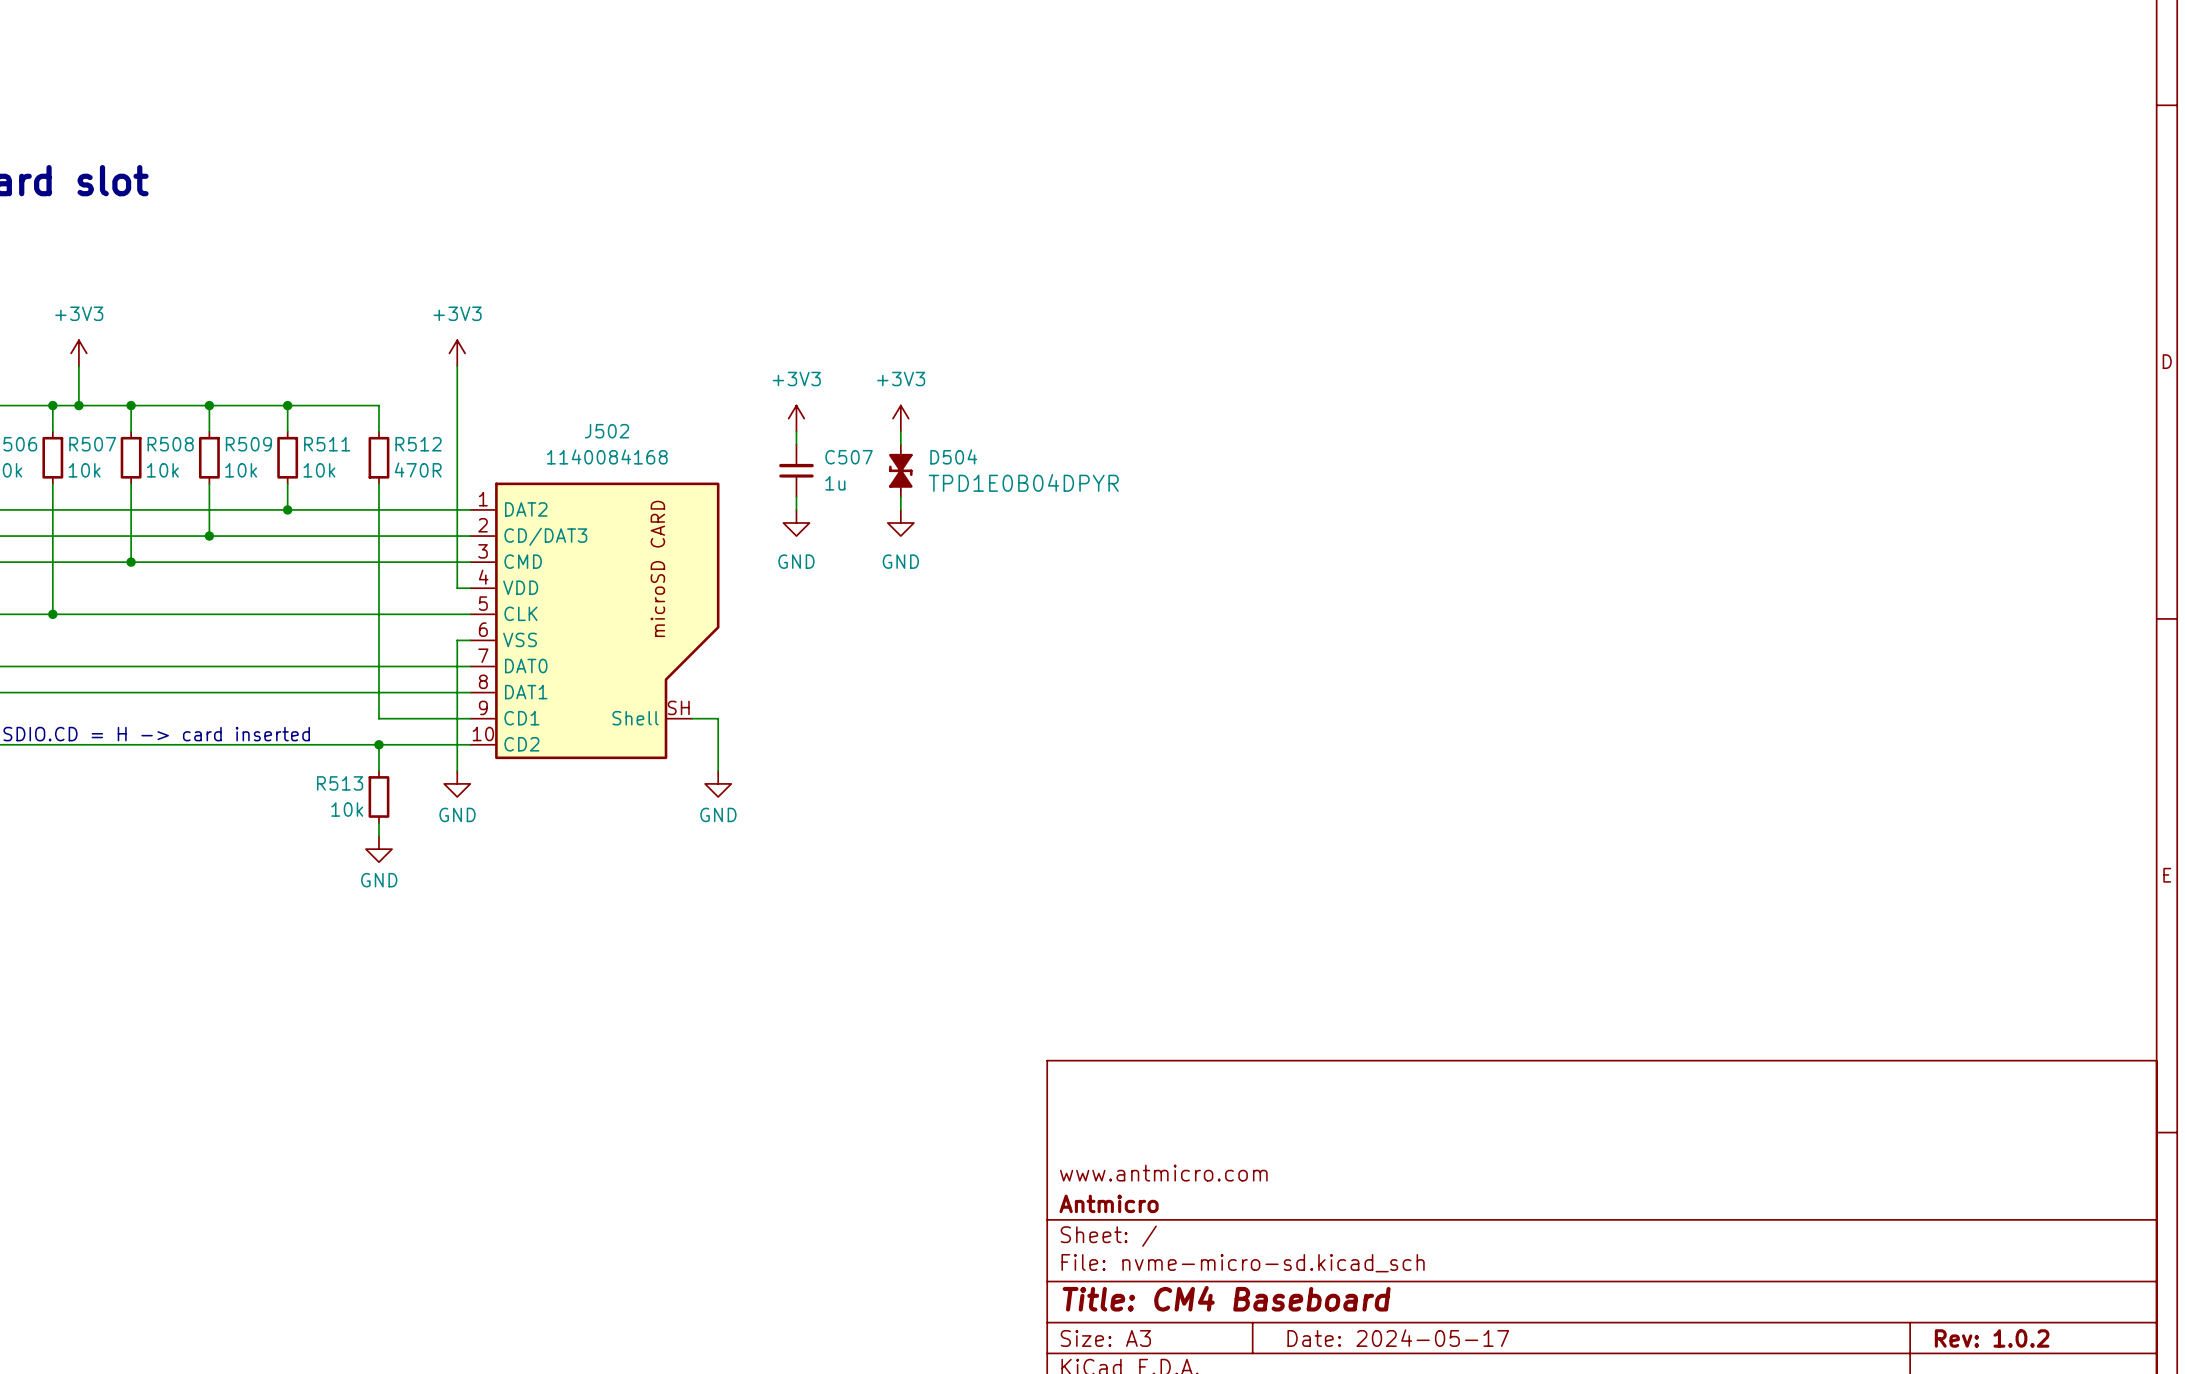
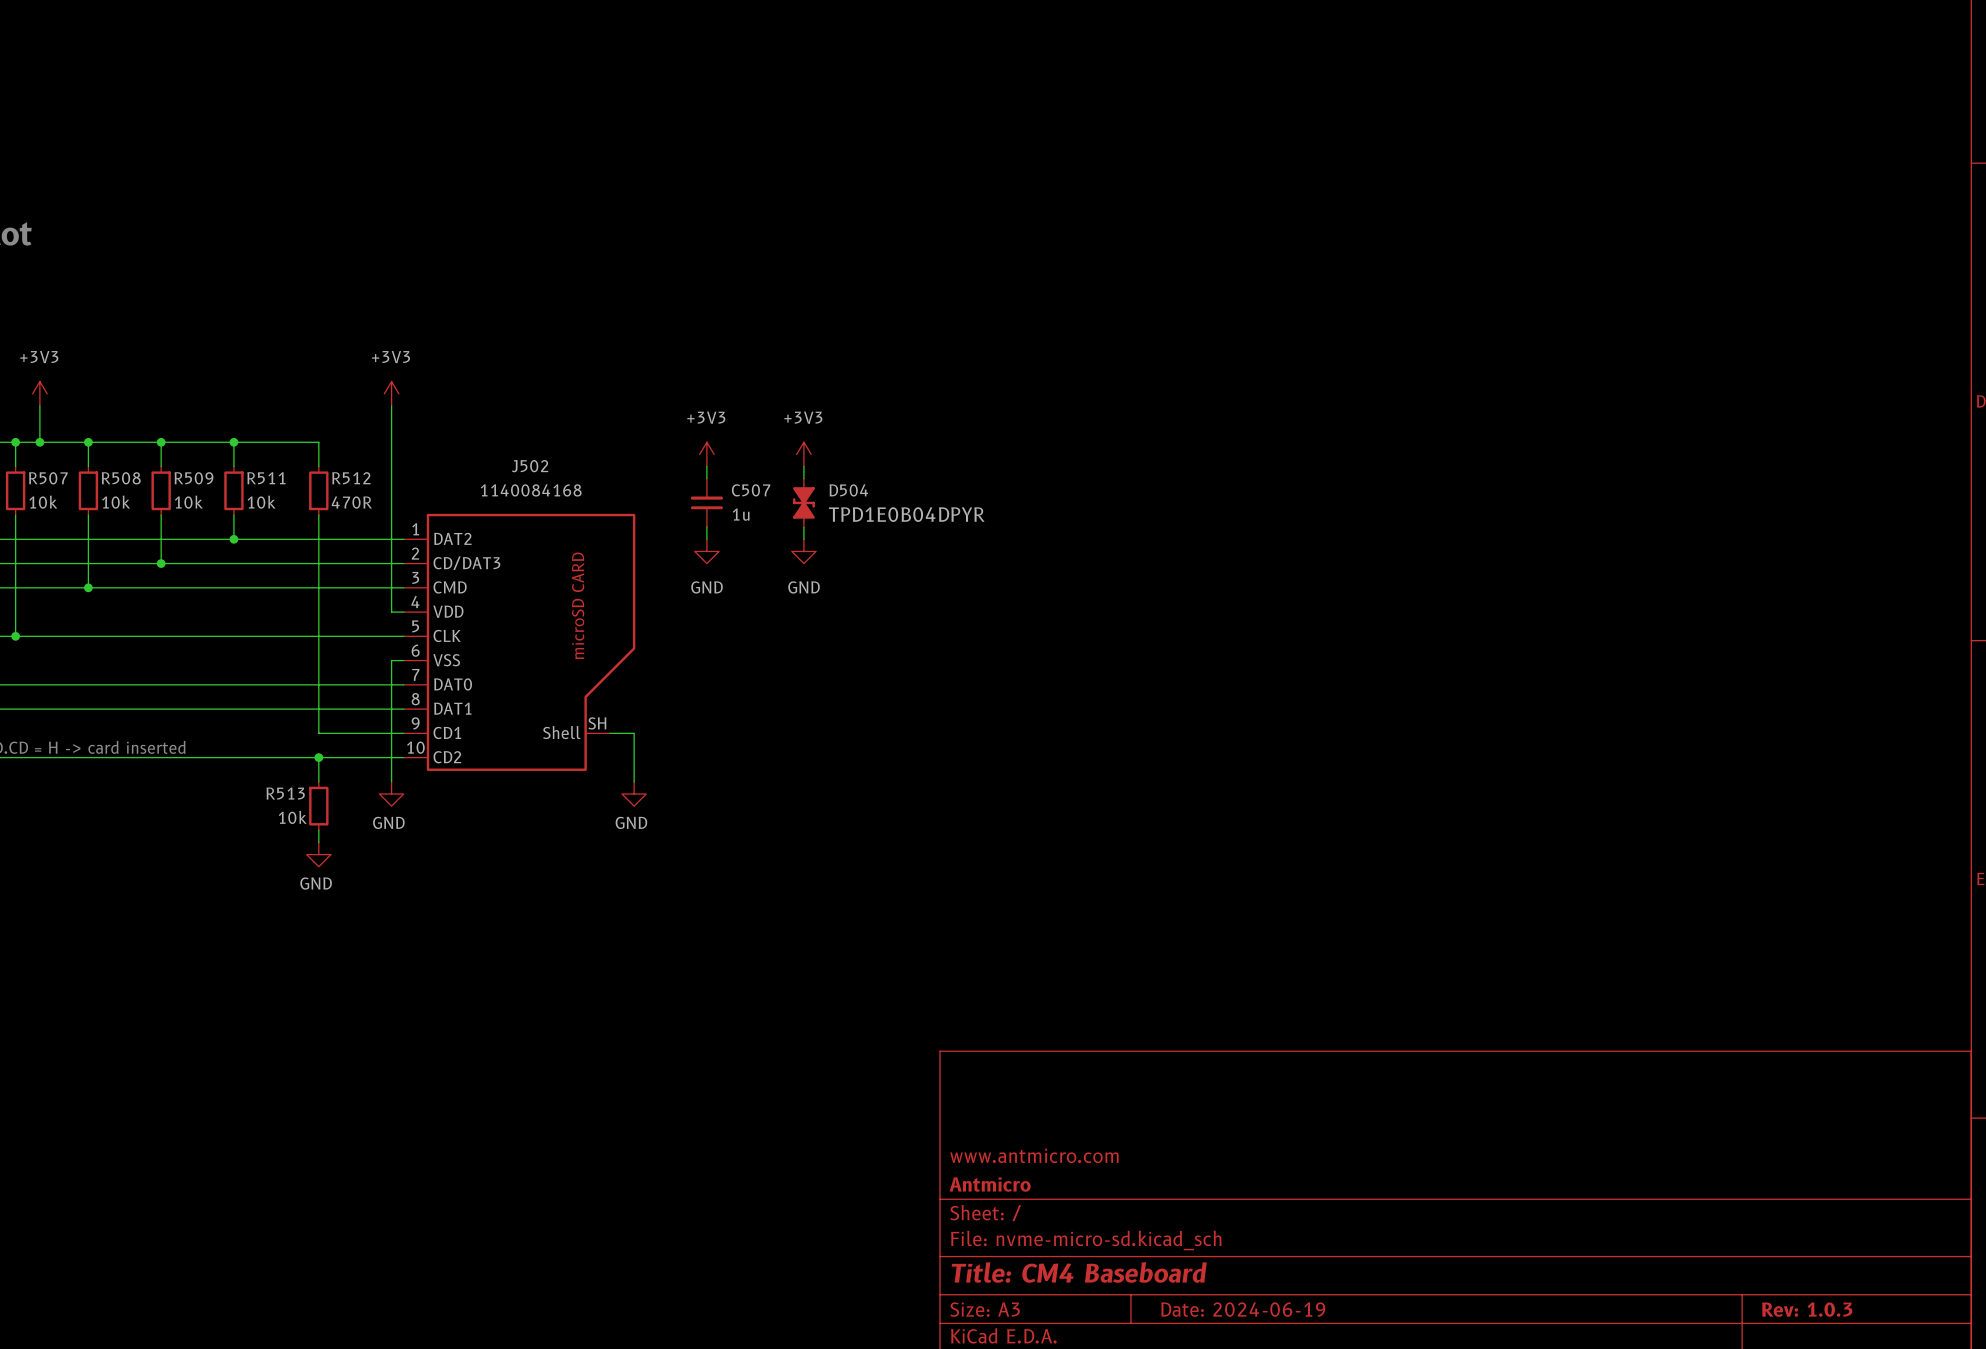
title block: Date: 2024-05-17 (1398, 1338) -> Date: 2024-06-19 (1243, 1309)
title block: Rev: 1.0.2 (1992, 1338) -> Rev: 1.0.3 (1807, 1309)

